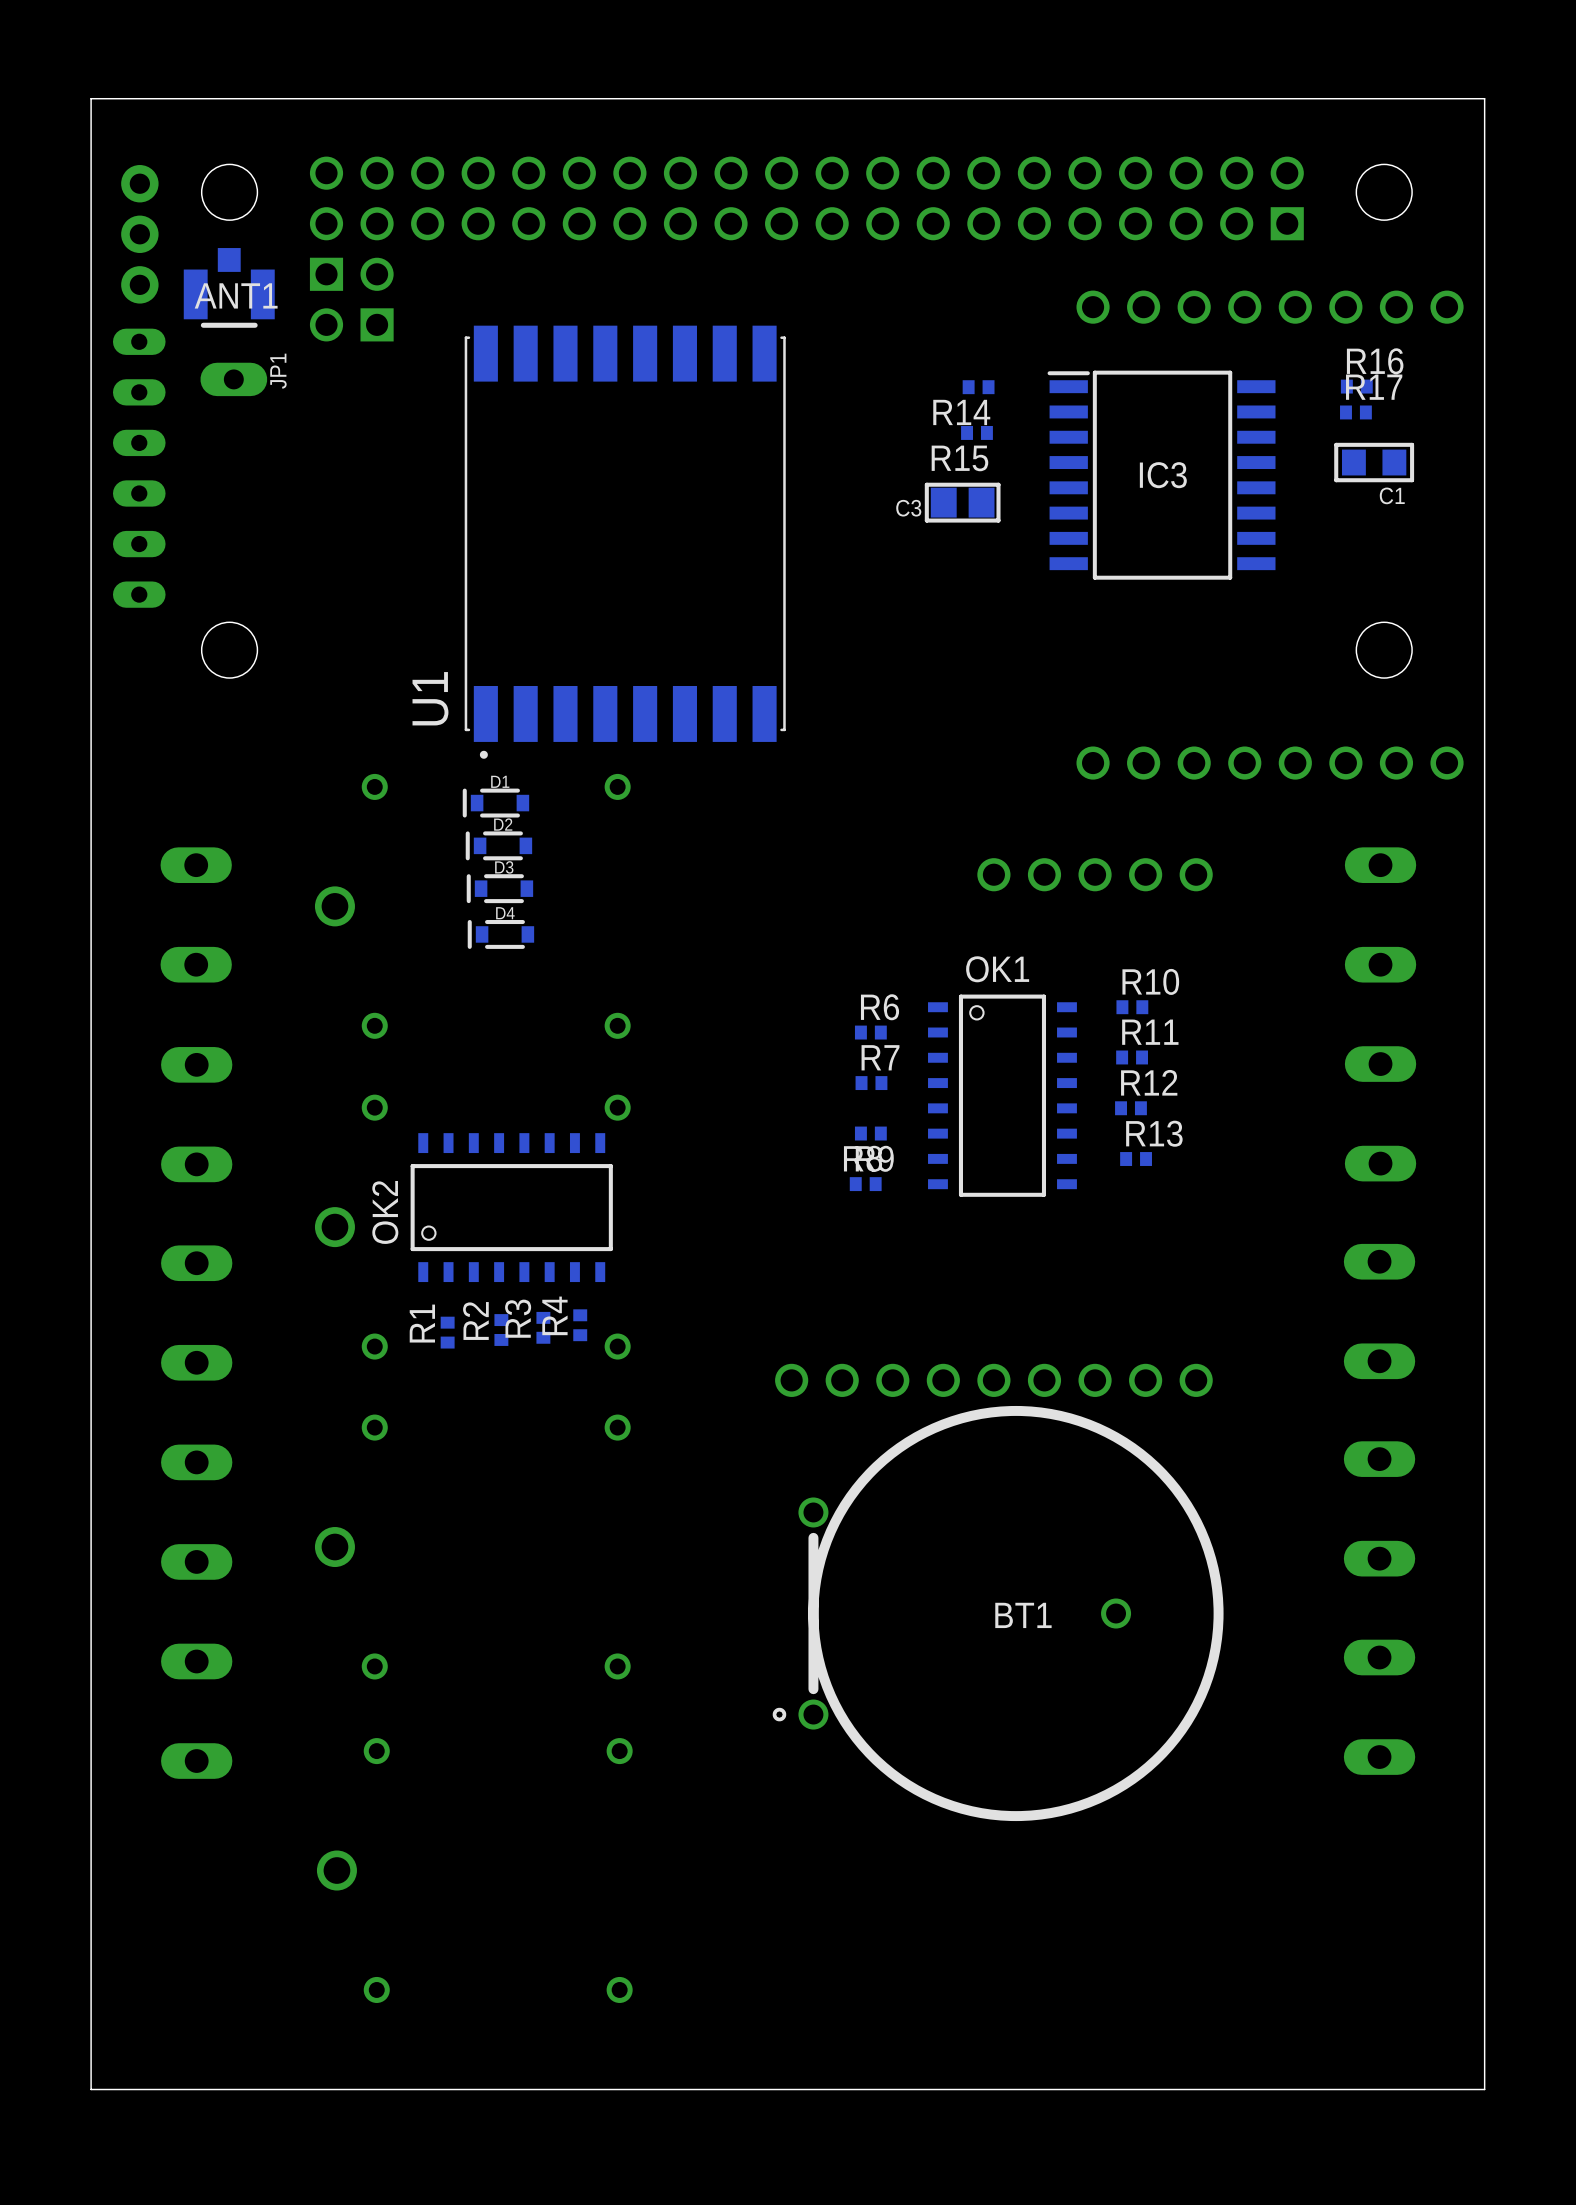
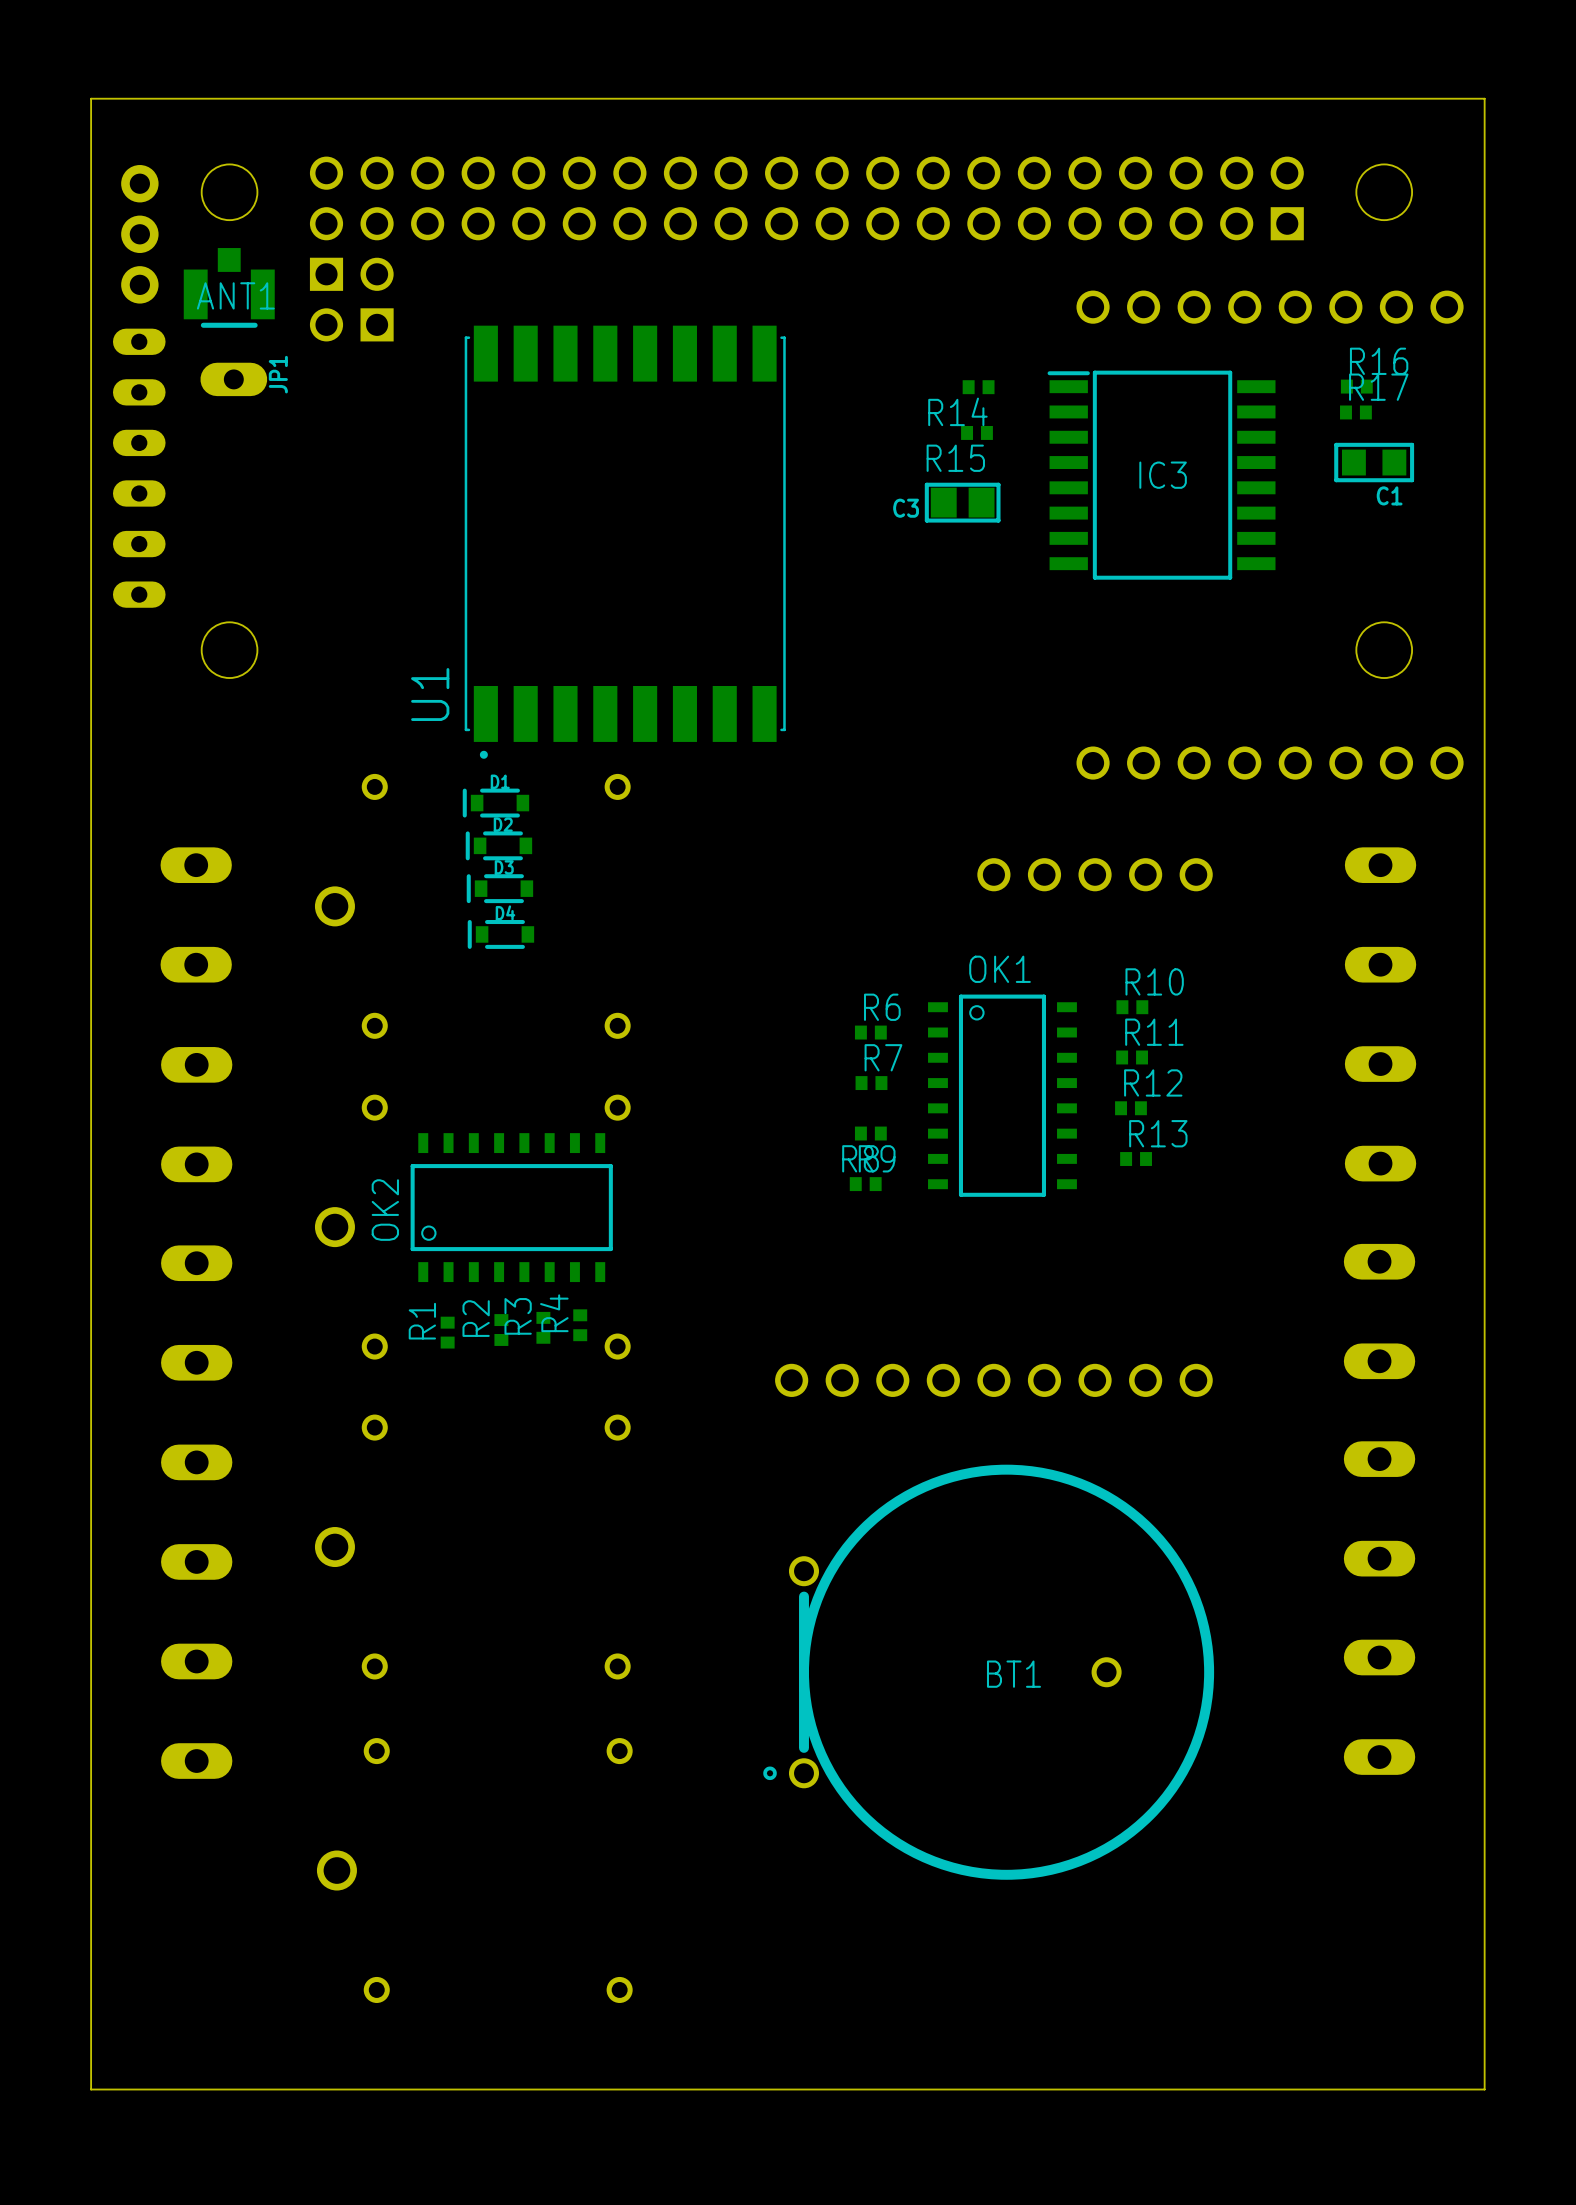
BT1 position: (998, 1613) -> (988, 1672)

